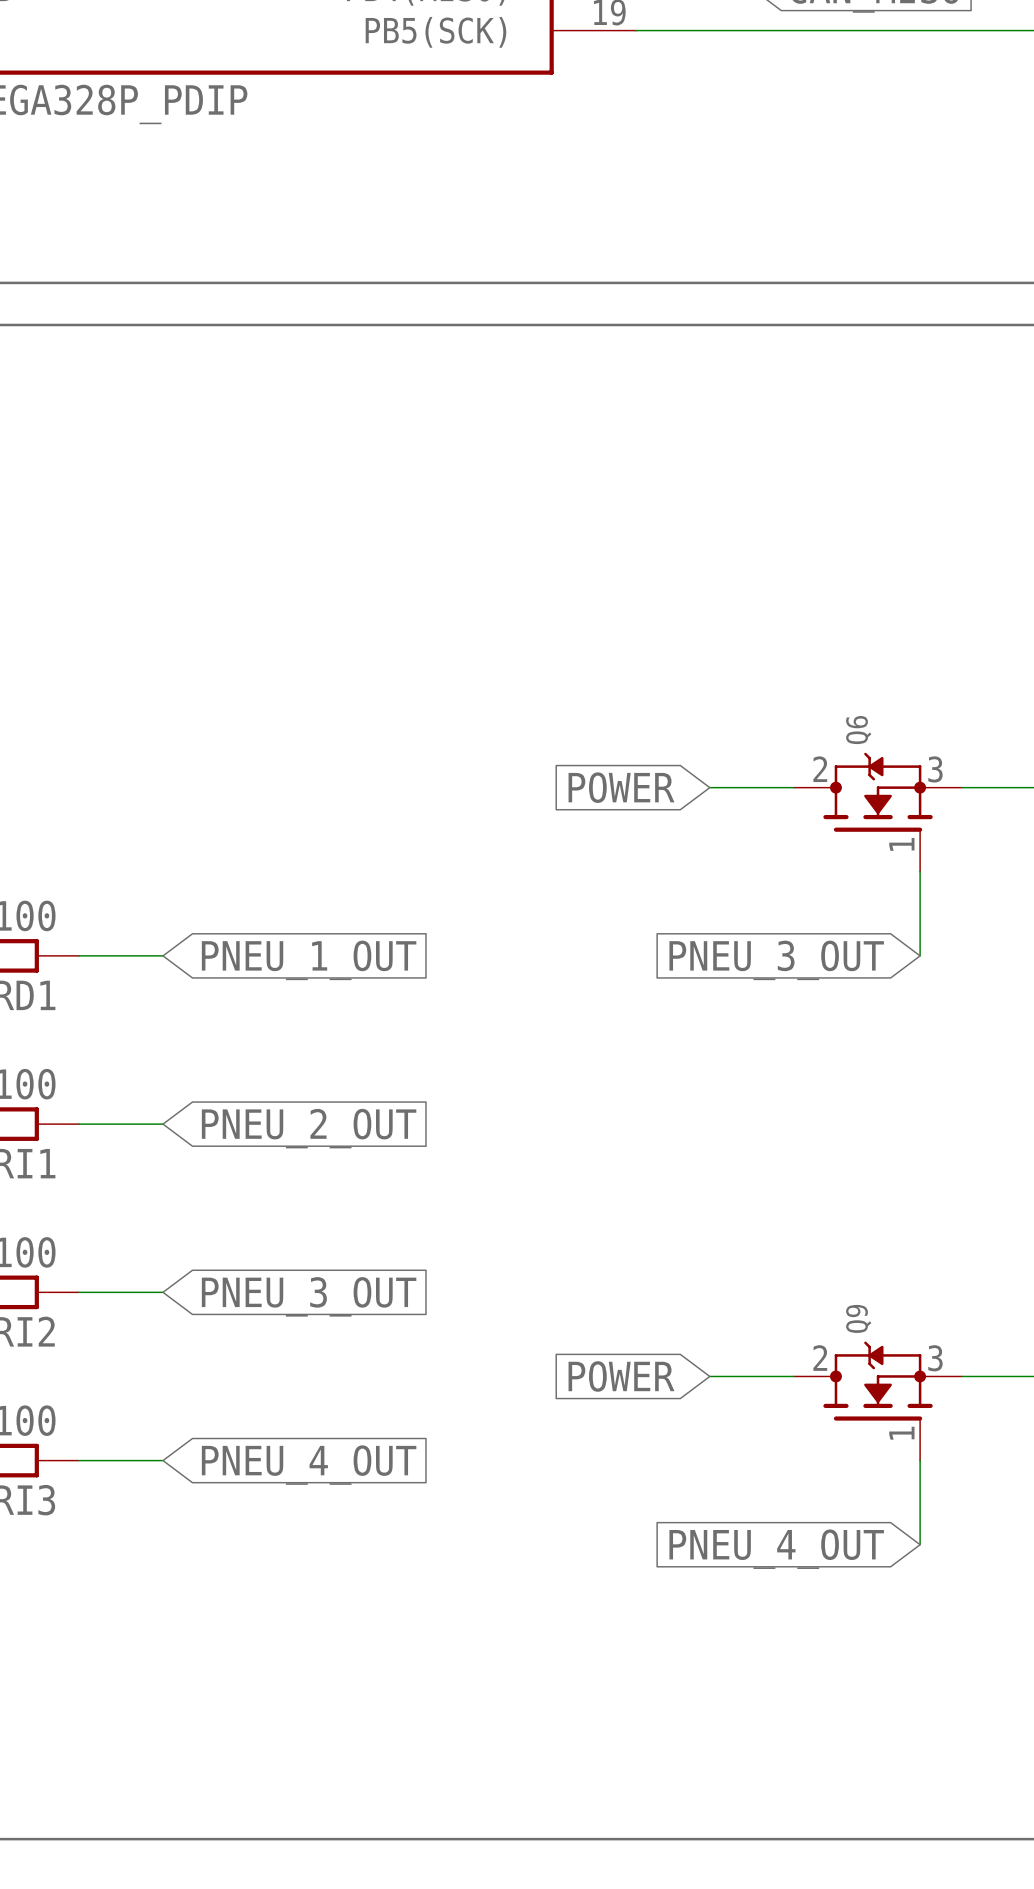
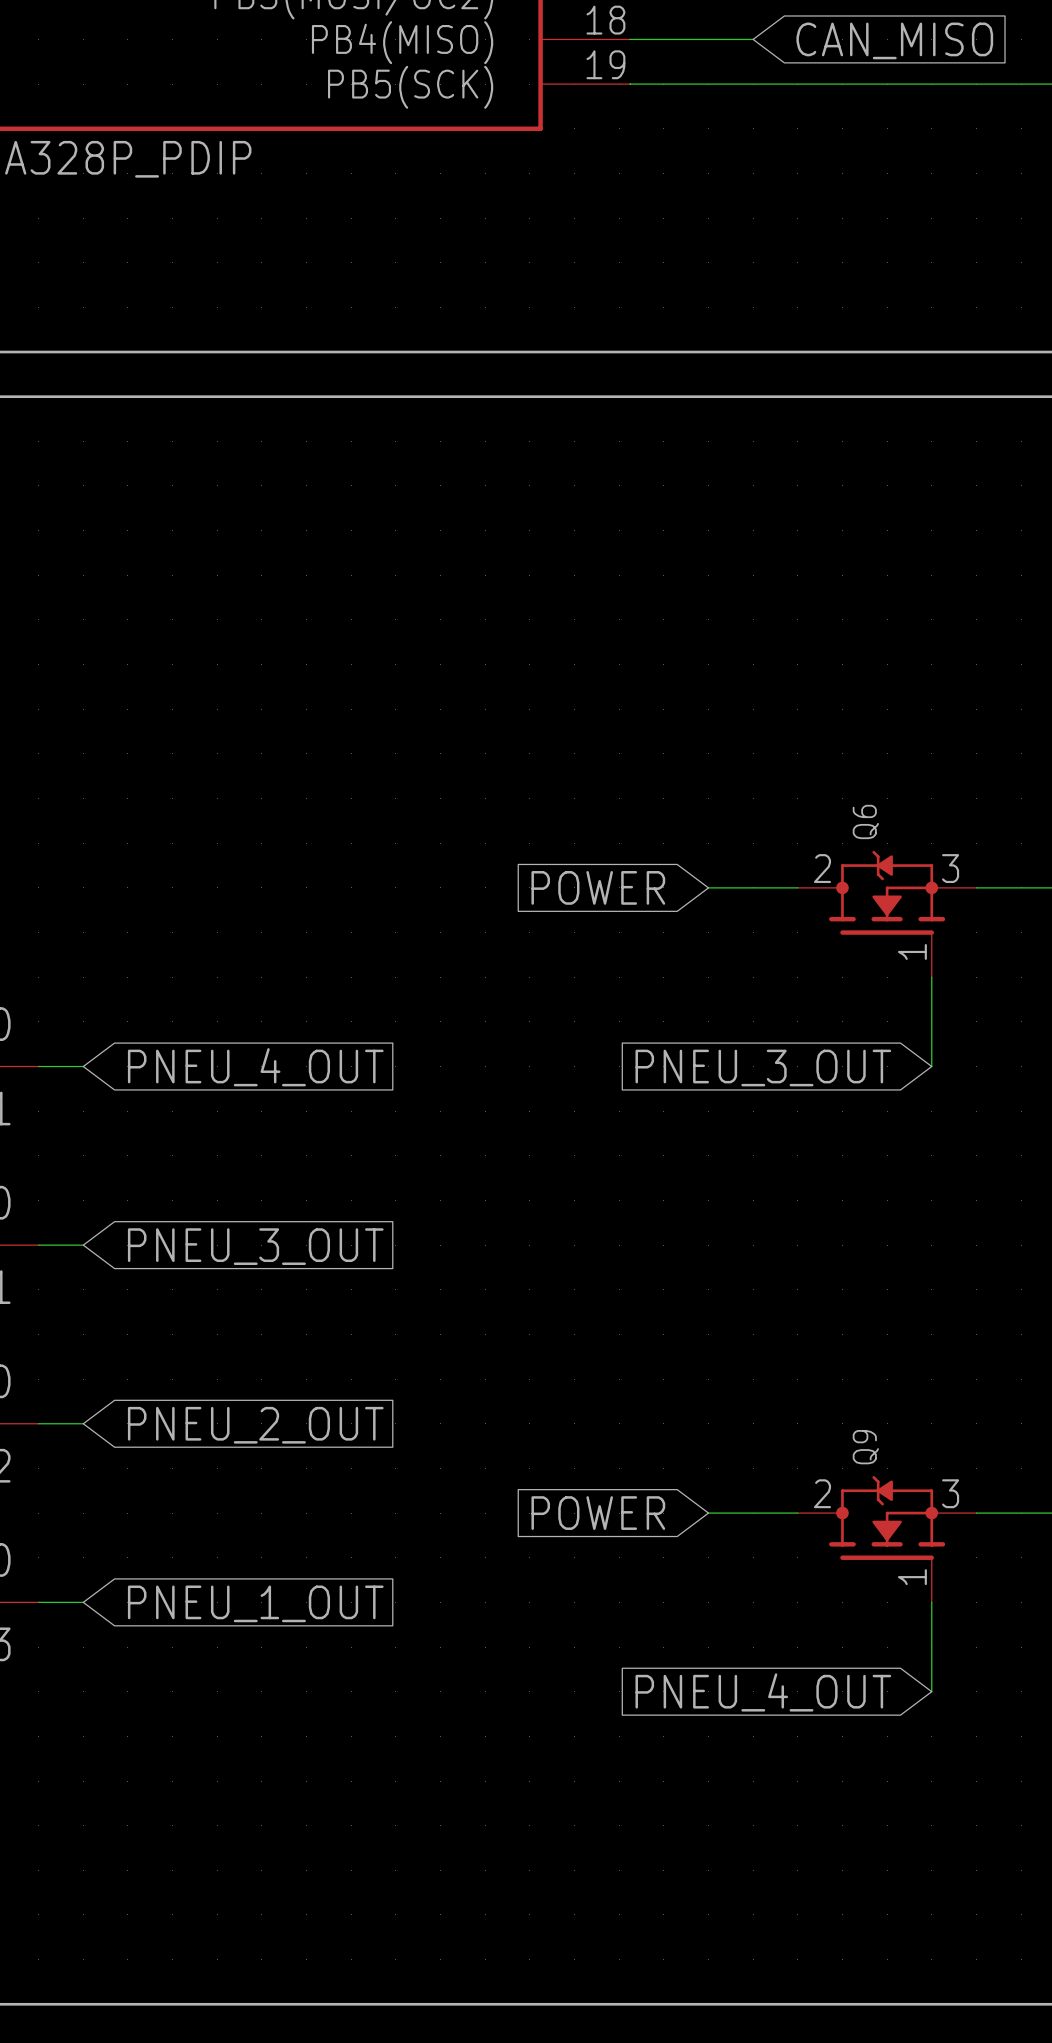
wire: (120, 955) (163, 955) -> none
global label: PNEU_1_OUT (309, 960) -> PNEU_4_OUT (255, 1067)
wire: (120, 1124) (163, 1124) -> none
global label position: PNEU_2_OUT (309, 1128) -> PNEU_2_OUT (255, 1425)
wire: (120, 1292) (163, 1292) -> none
global label position: PNEU_3_OUT (309, 1296) -> PNEU_3_OUT (255, 1246)
wire: (120, 1460) (163, 1460) -> none
global label: PNEU_4_OUT (309, 1465) -> PNEU_1_OUT (255, 1603)

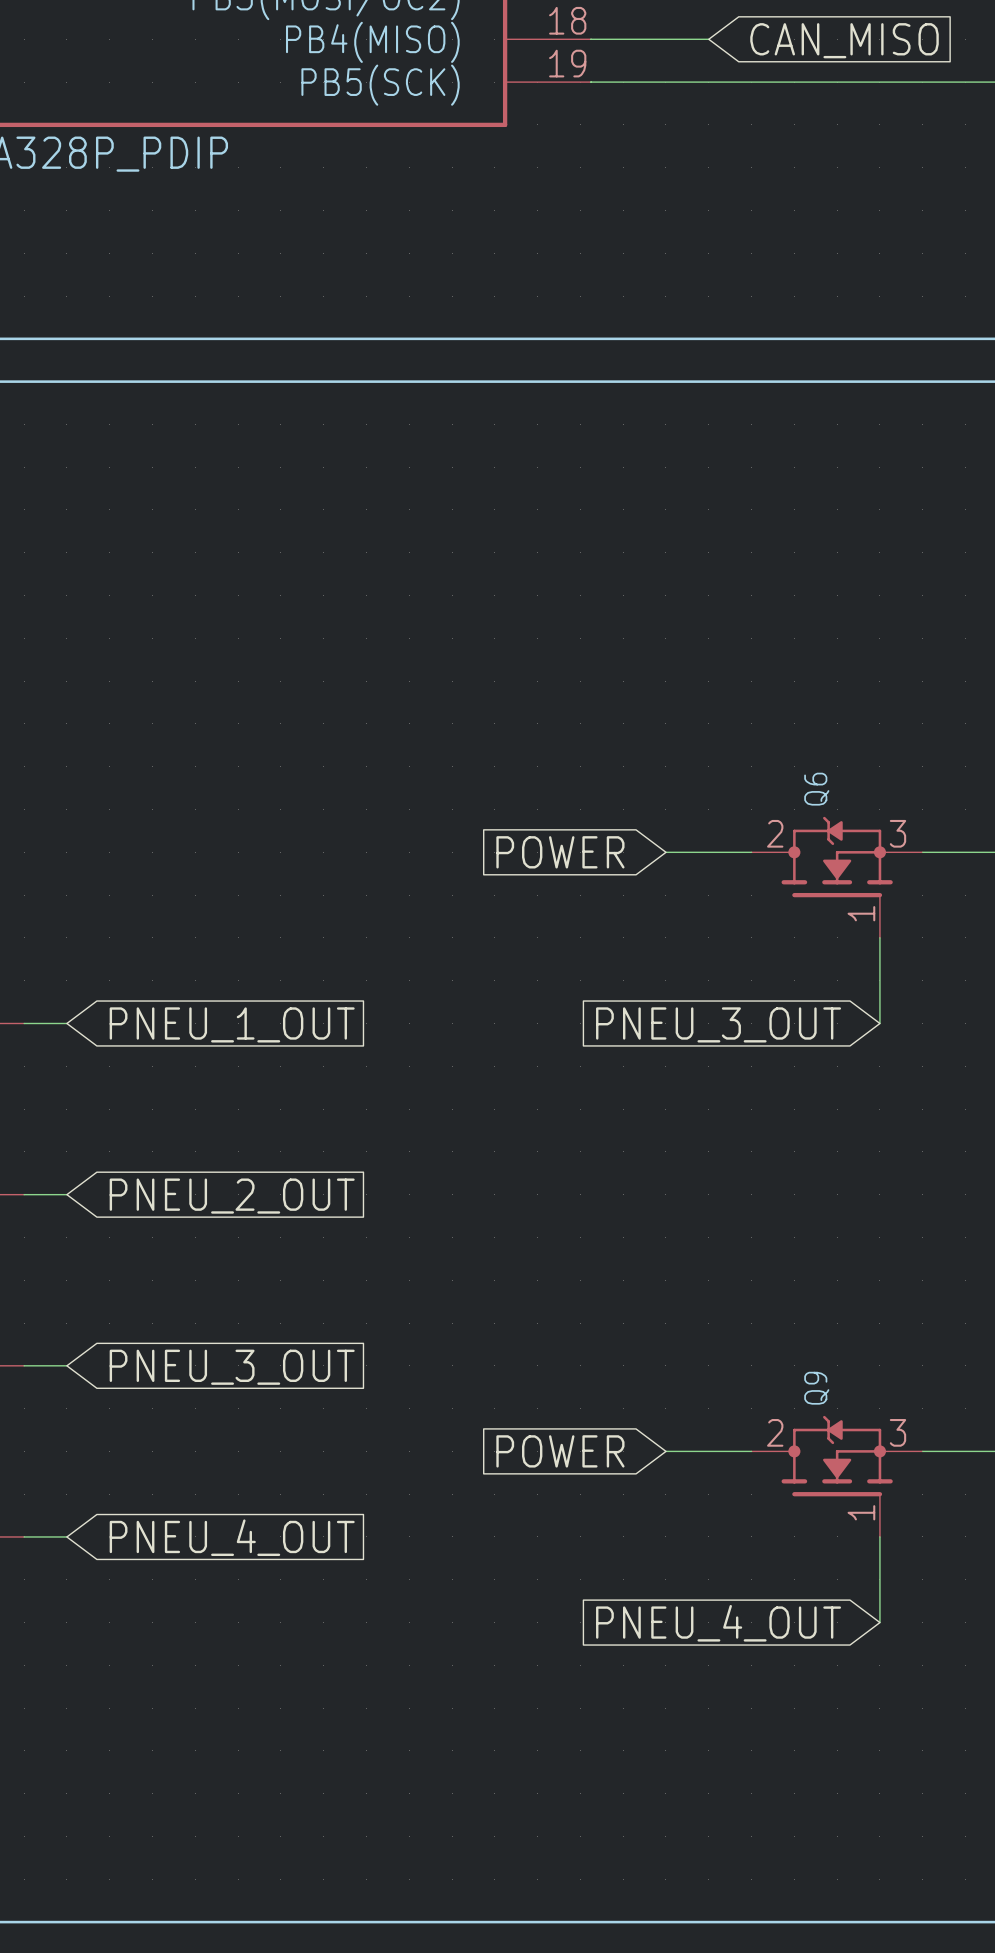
global label: PNEU_4_OUT (255, 1067) -> PNEU_1_OUT (232, 1024)
global label: PNEU_3_OUT (255, 1246) -> PNEU_2_OUT (232, 1196)
global label: PNEU_2_OUT (255, 1425) -> PNEU_3_OUT (232, 1367)
global label: PNEU_1_OUT (255, 1603) -> PNEU_4_OUT (232, 1537)

